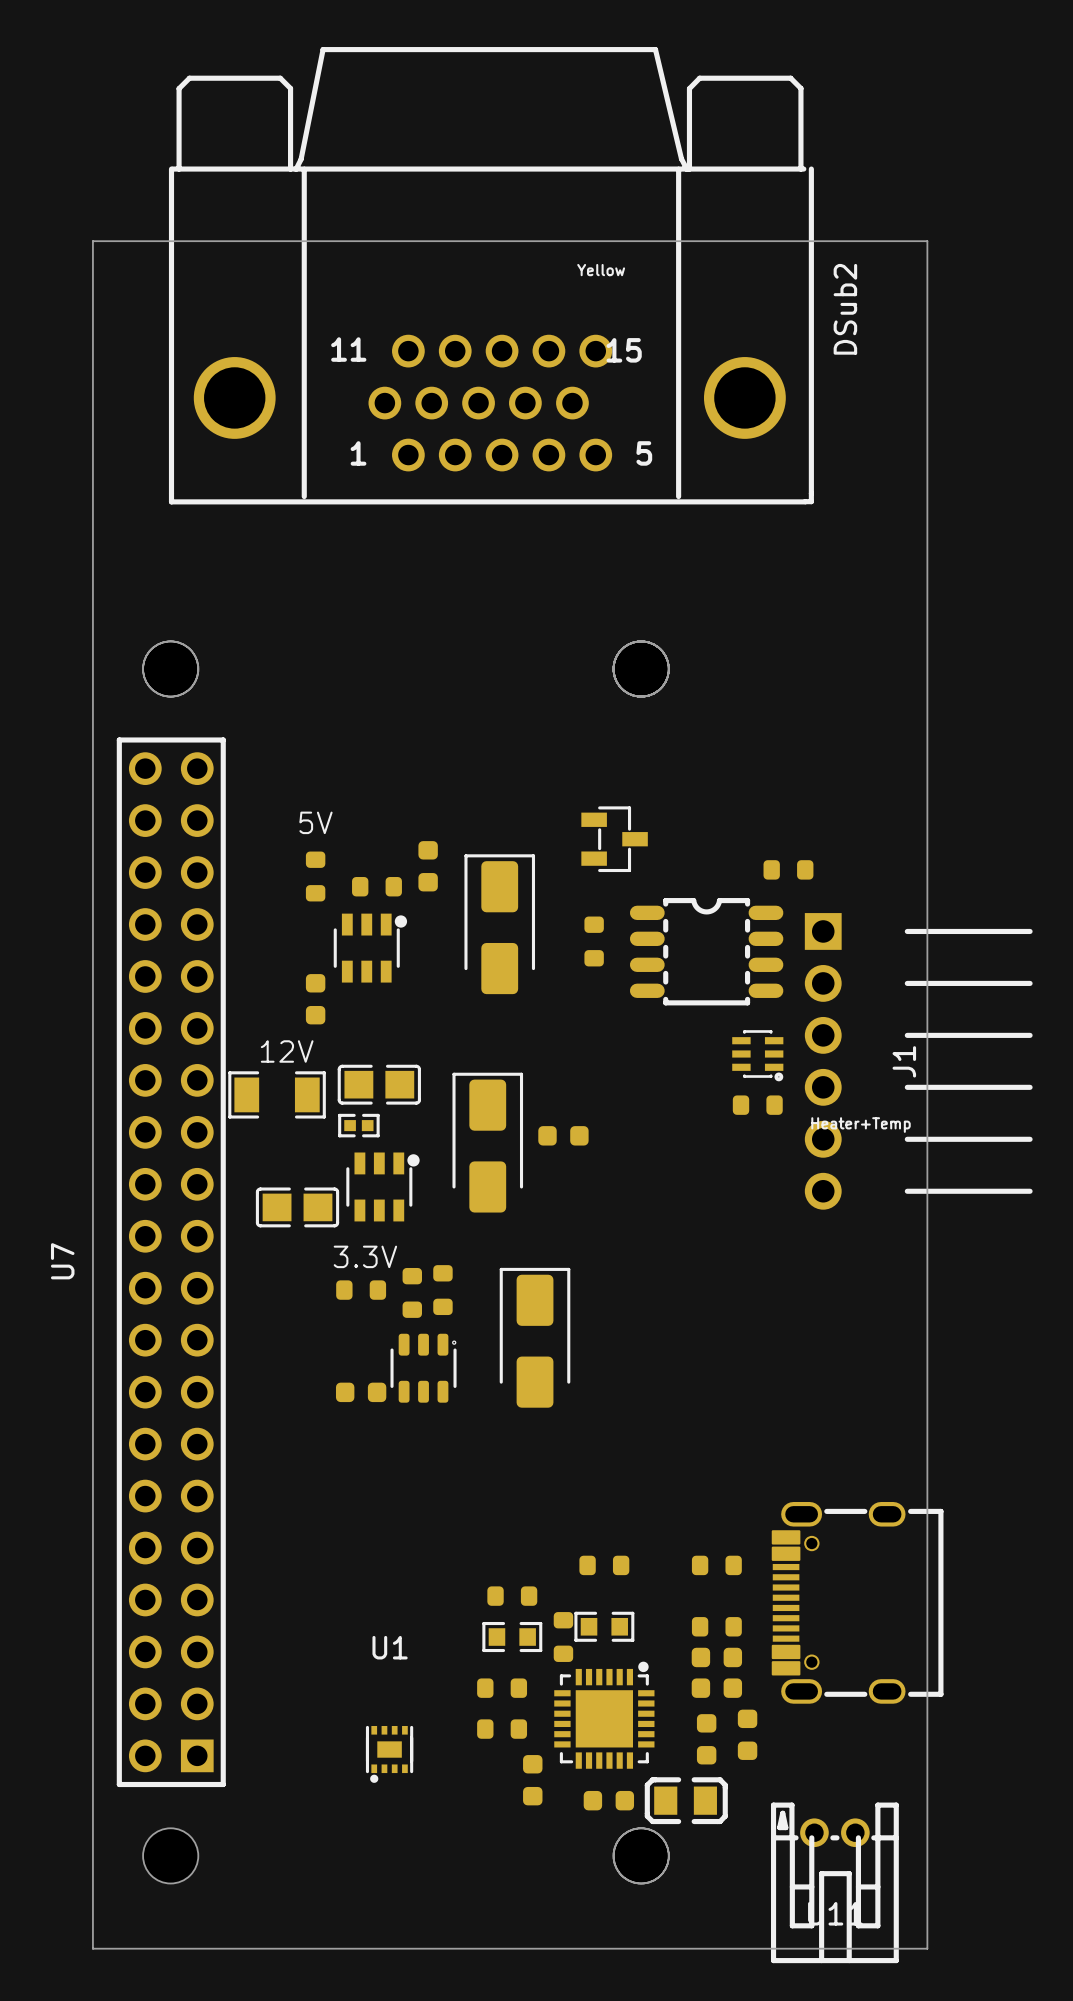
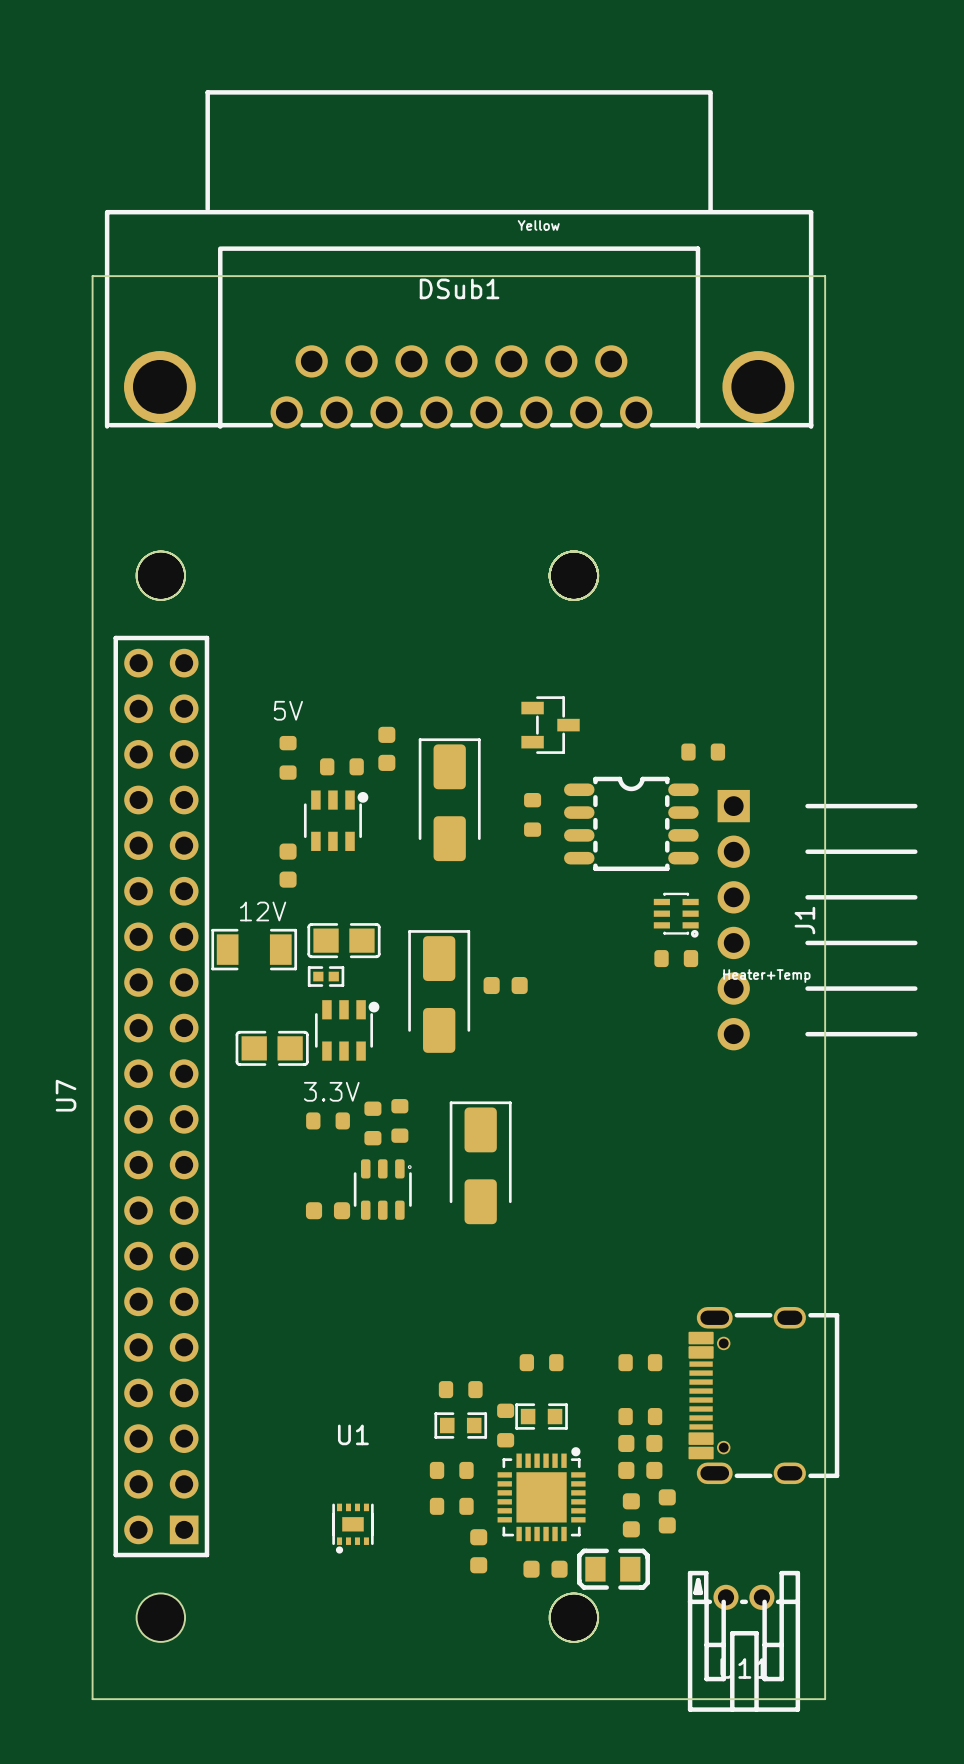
DSub2: (491, 275) -> none
DSub1: none -> (459, 259)
board edge: (92, 327) (92, 241) (927, 241) (927, 327) -> (92, 276) (825, 276)

